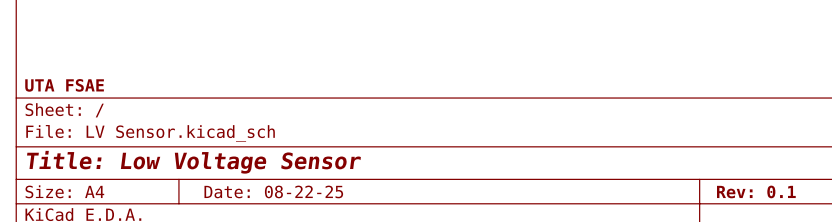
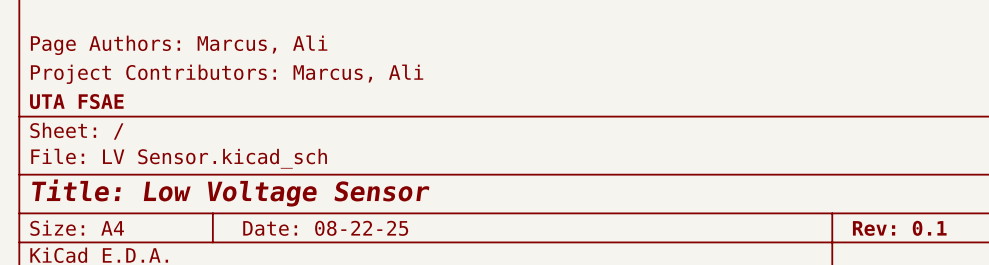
title block: none -> Page Authors: Marcus, Ali (179, 45)
title block: none -> Project Contributors: Marcus, Ali (227, 74)

